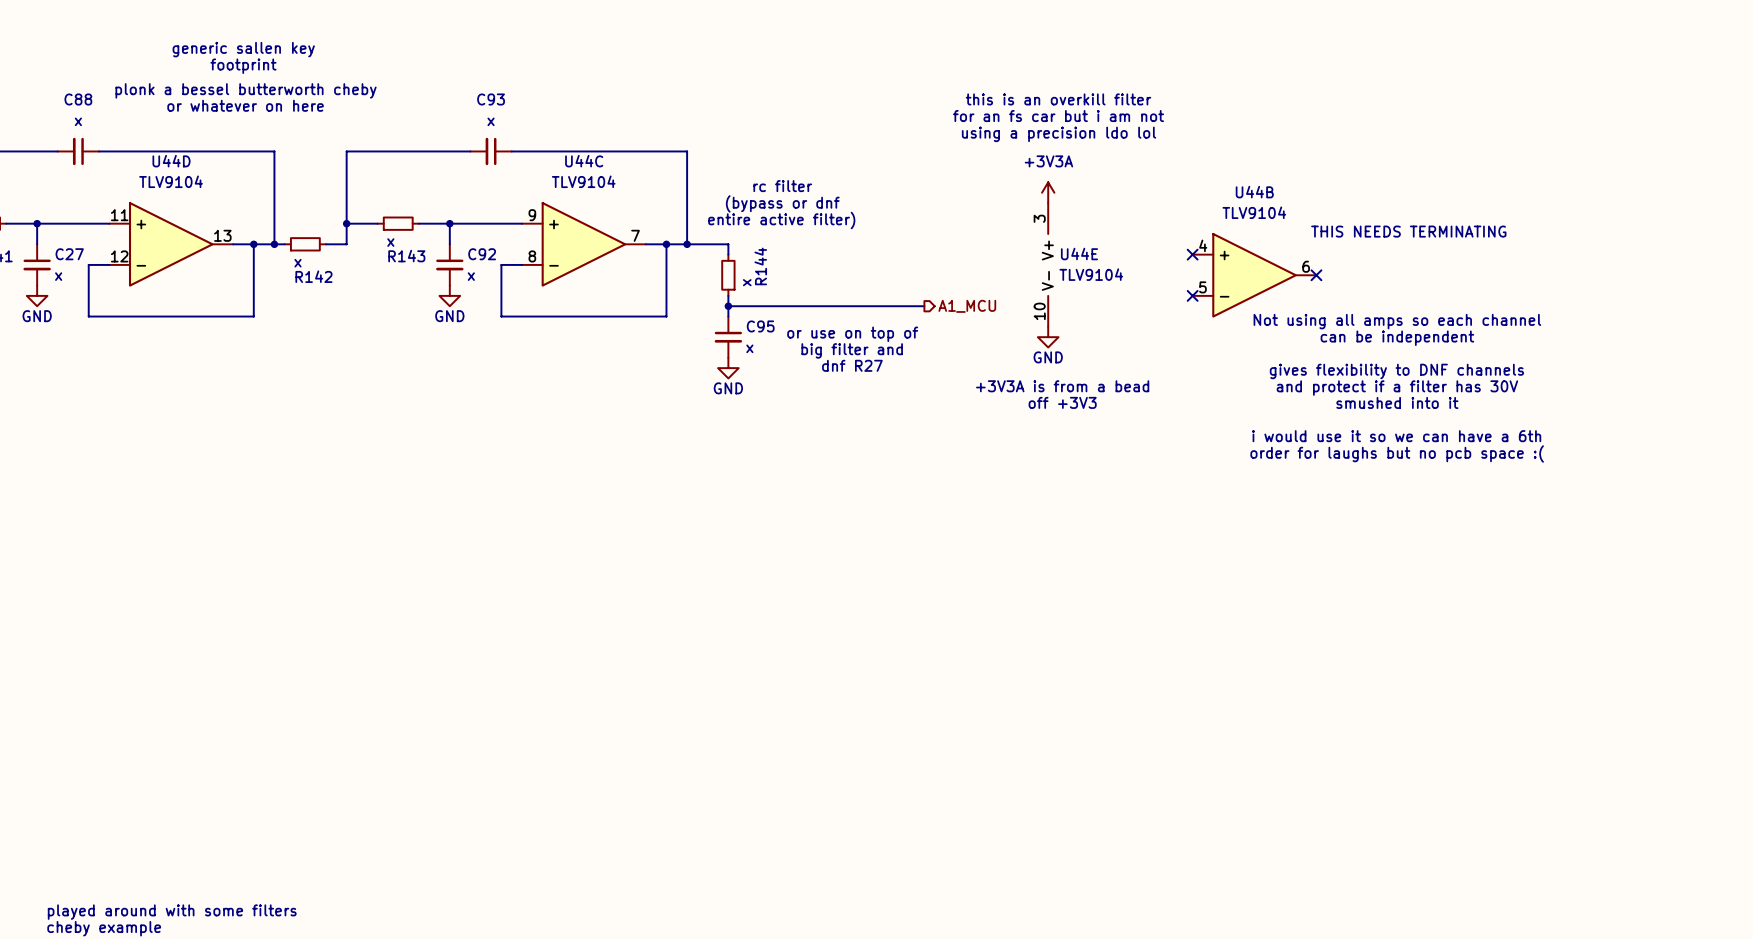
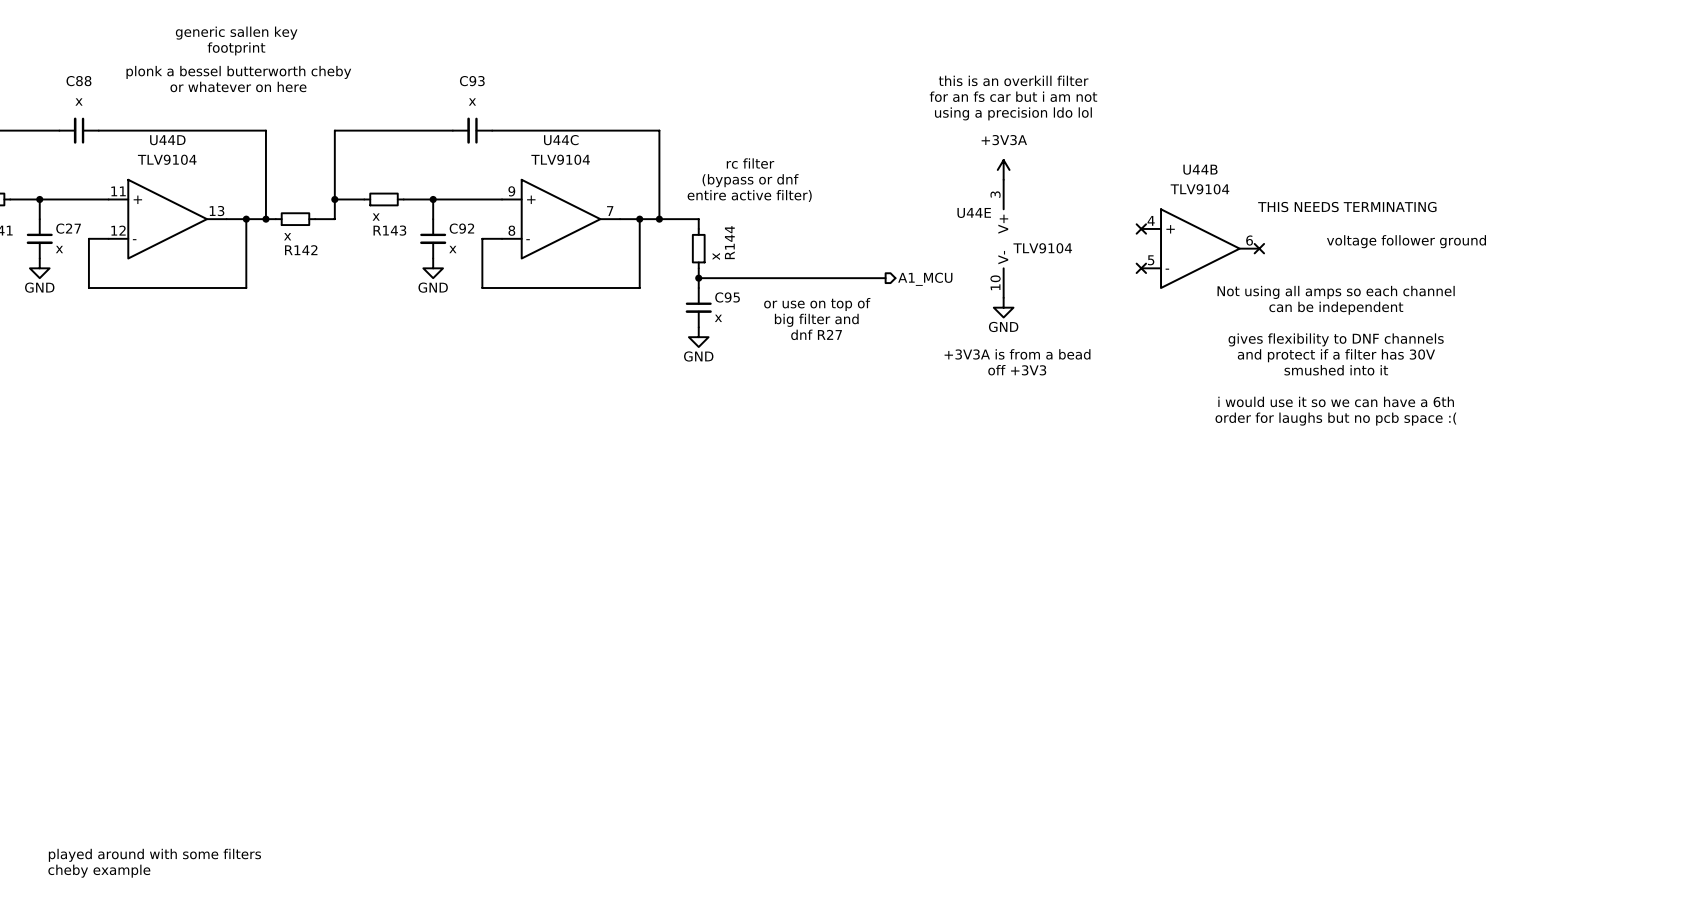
U44E name position: U44E (1079, 254) -> U44E (974, 212)
text: none -> voltage follower ground (1406, 241)

